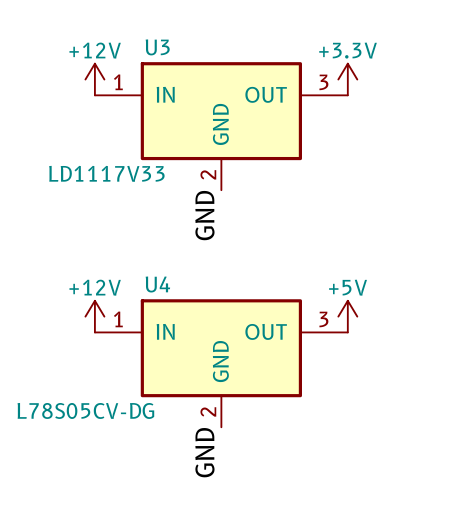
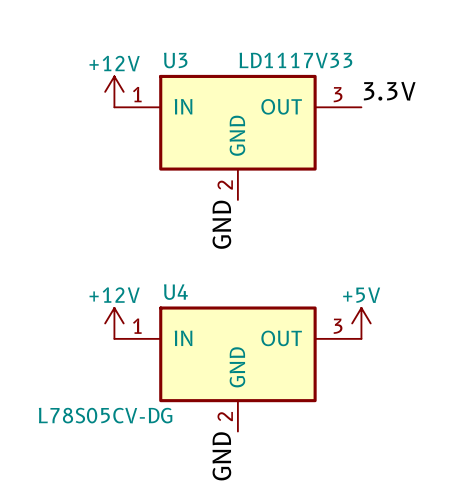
label: none -> 3.3V (389, 91)
power symbol: +3.3V (347, 79) -> none
U3 value position: LD1117V33 (106, 173) -> LD1117V33 (295, 60)

